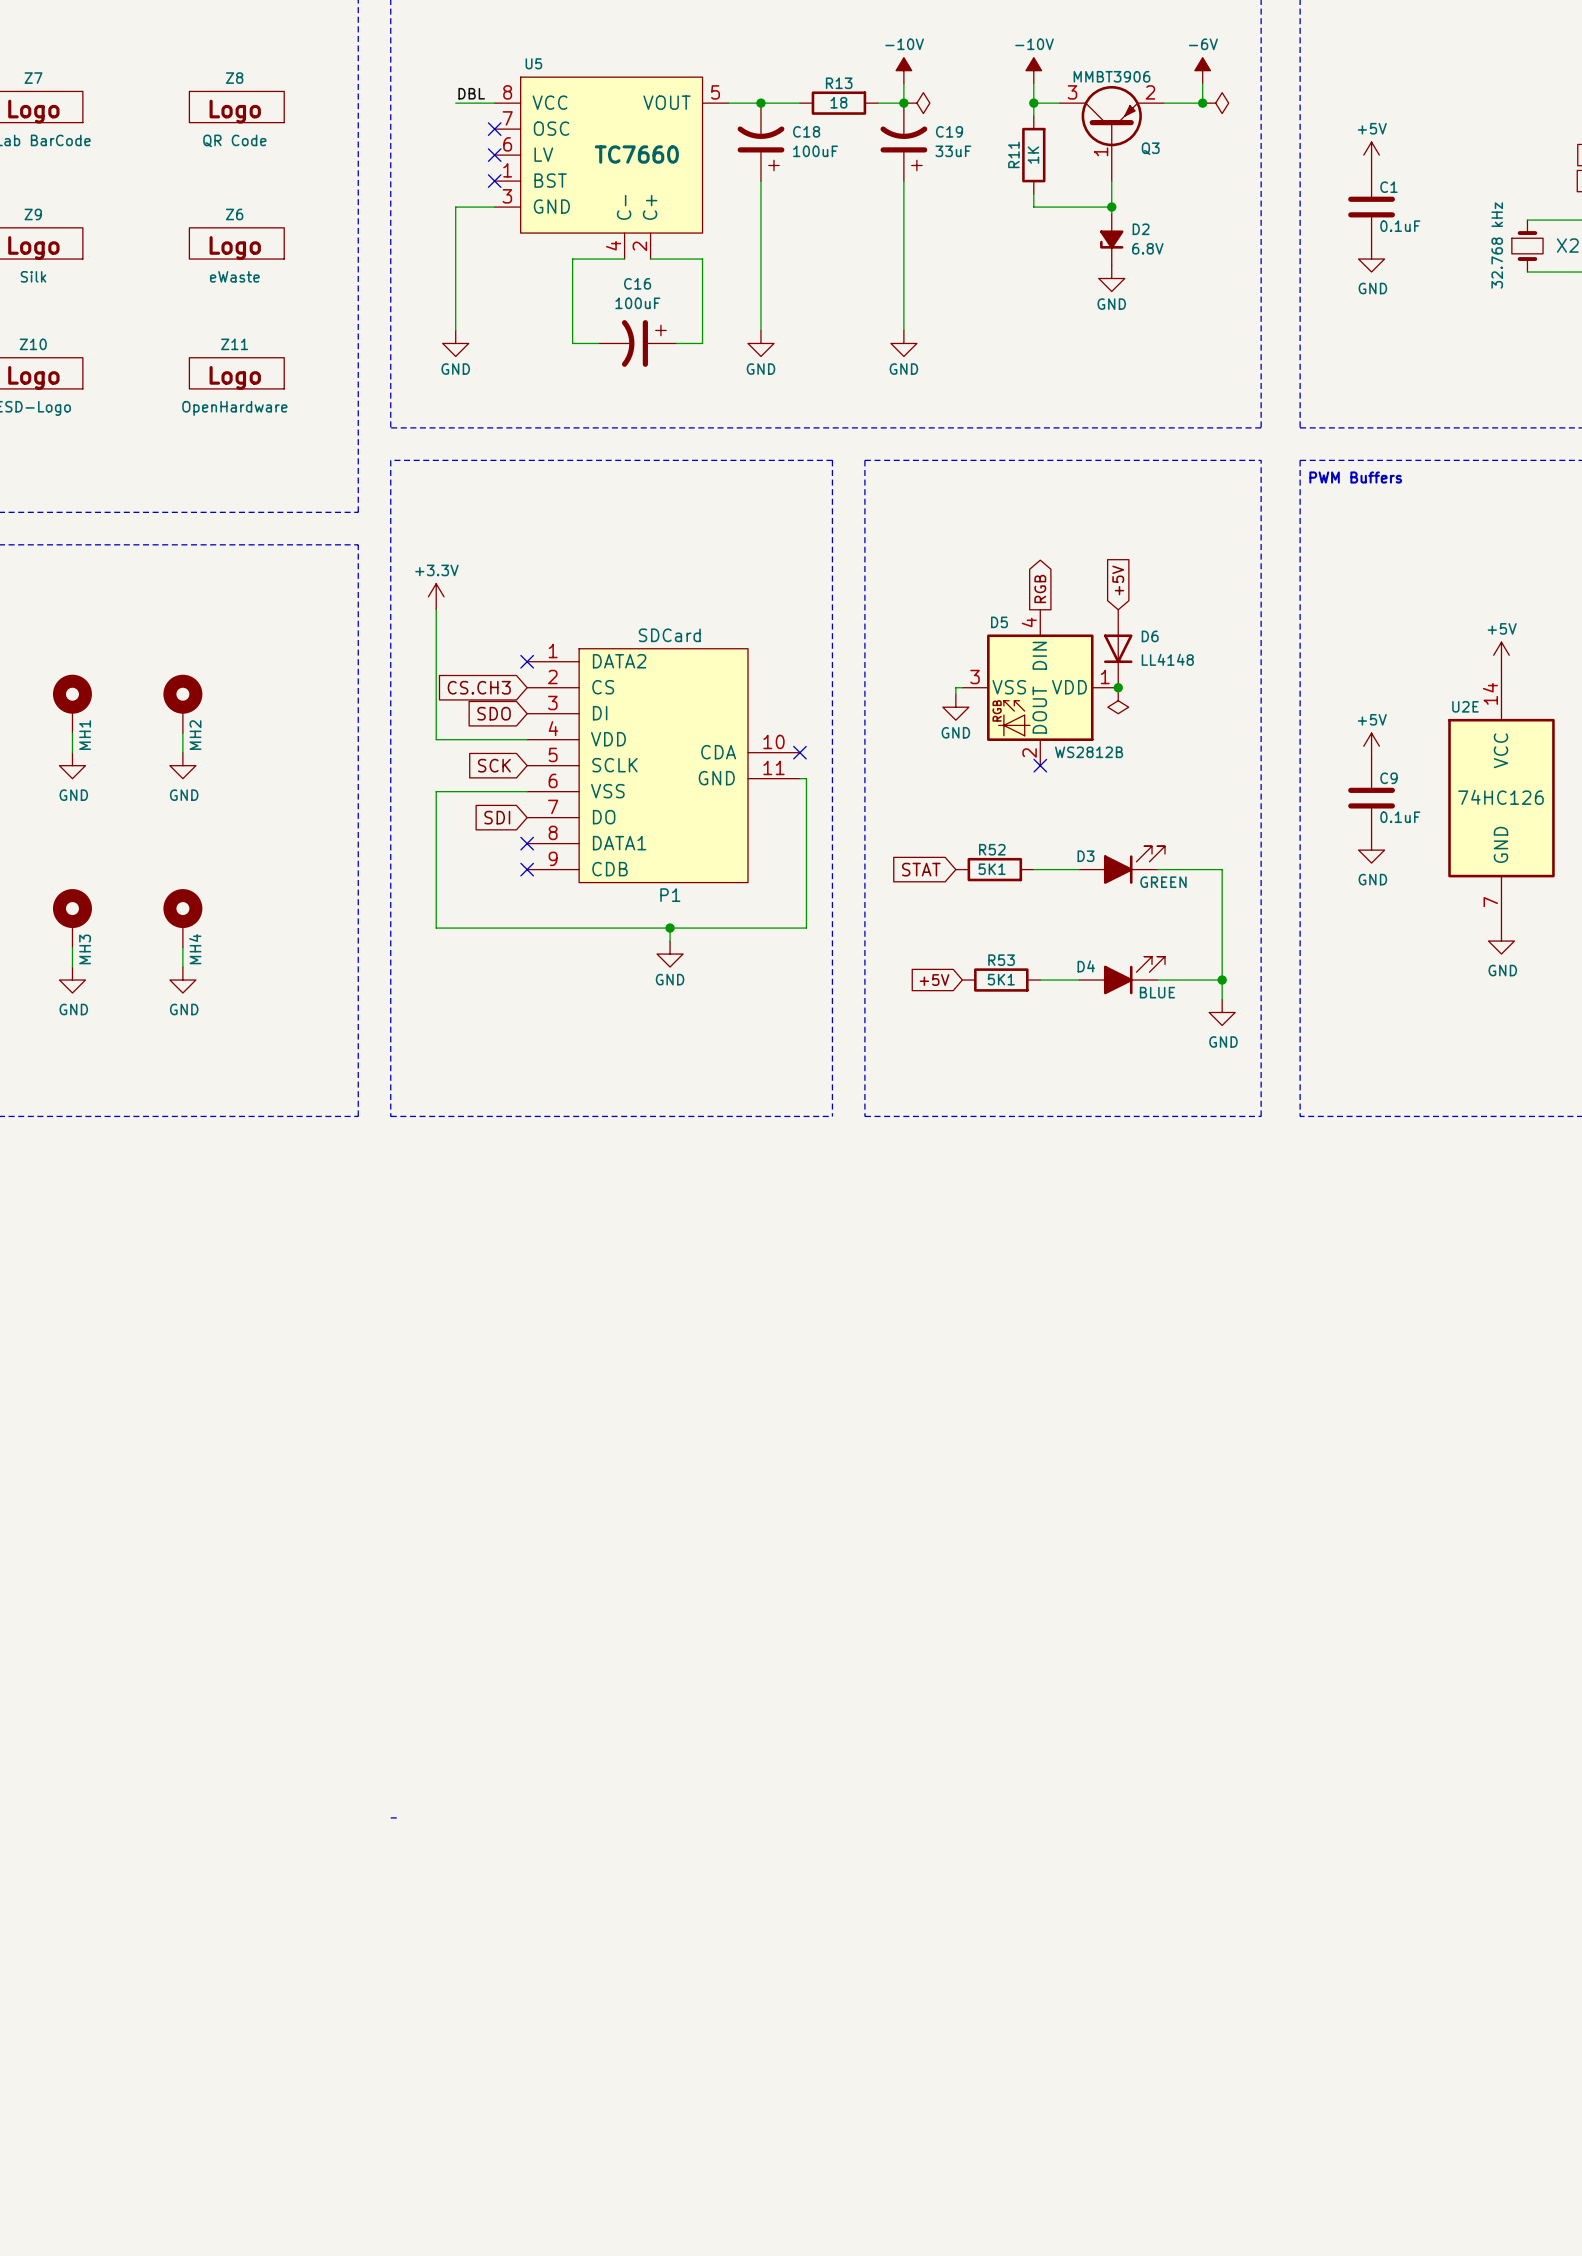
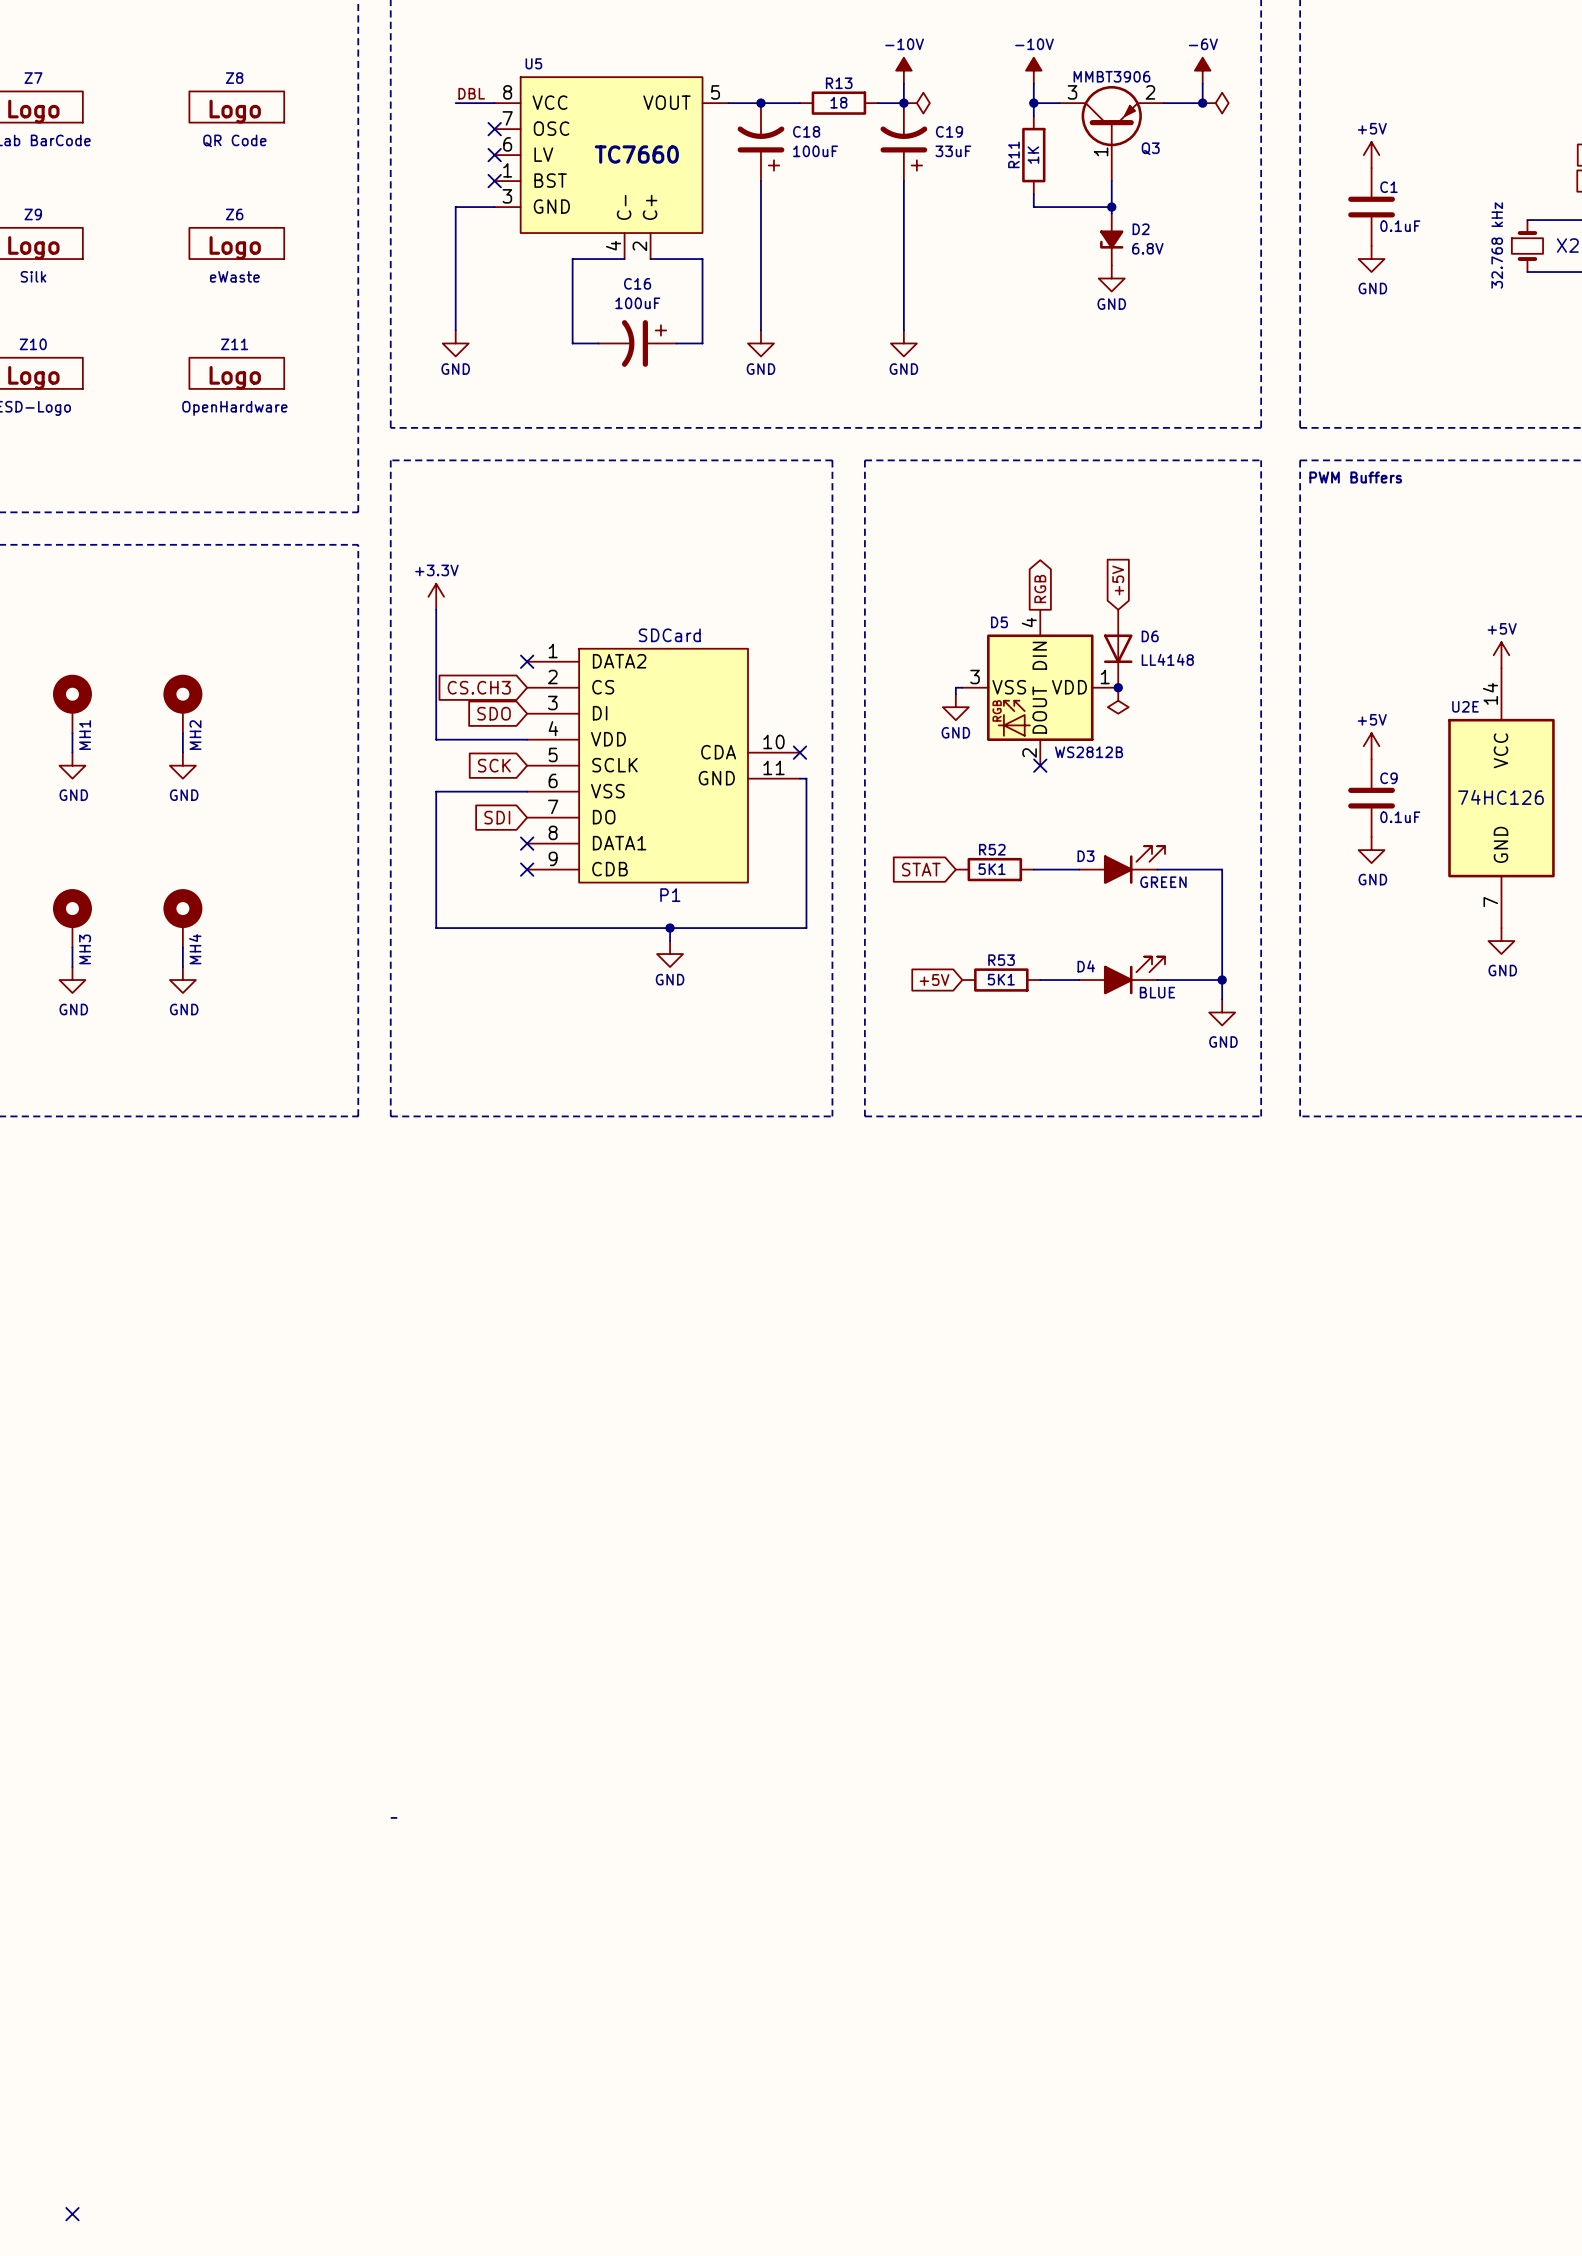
no-connect mark: none -> (72, 2214)

